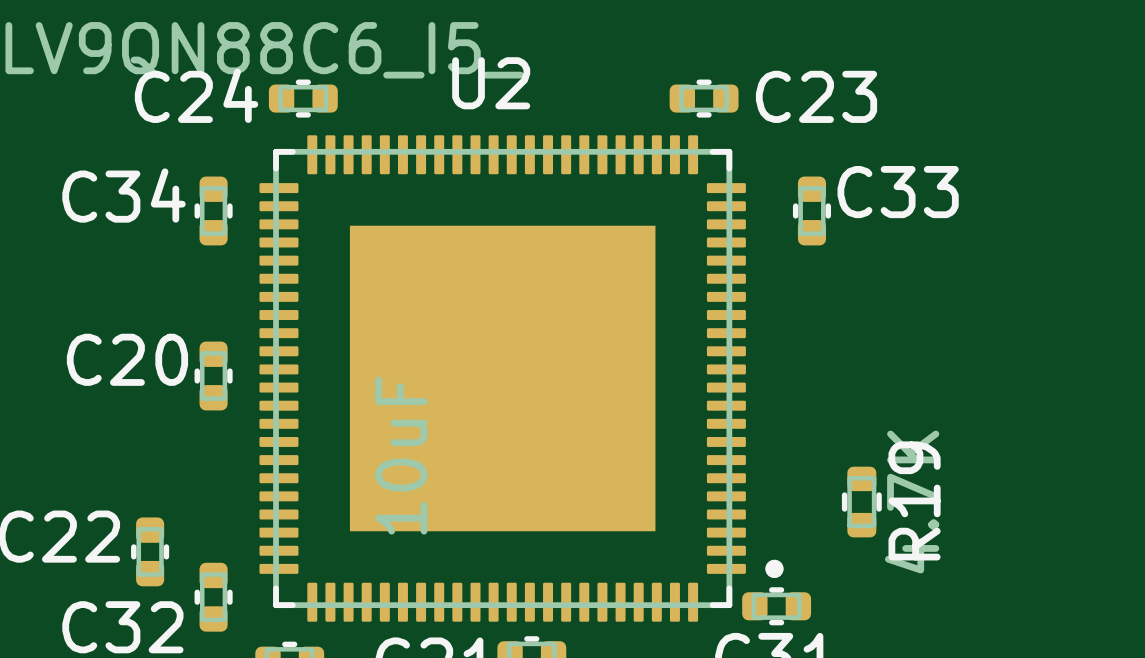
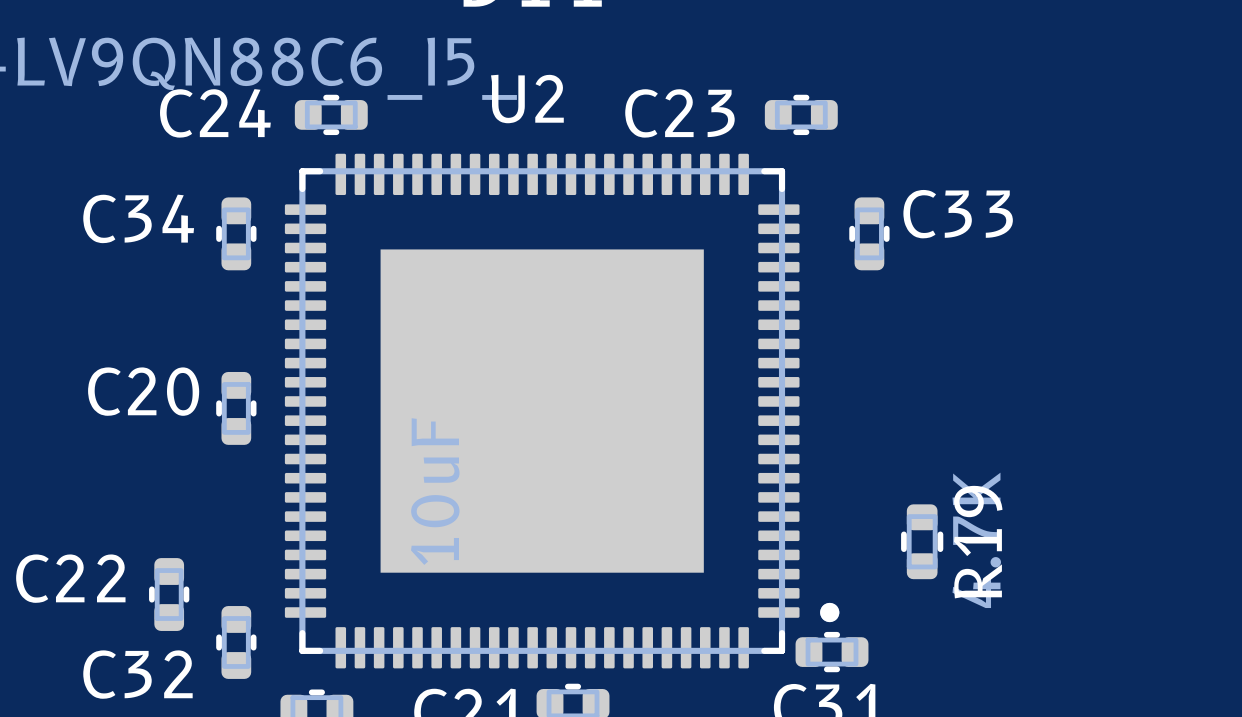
C23 name position: C23 (816, 96) -> C23 (679, 113)
C23 position: (704, 98) -> (801, 114)

